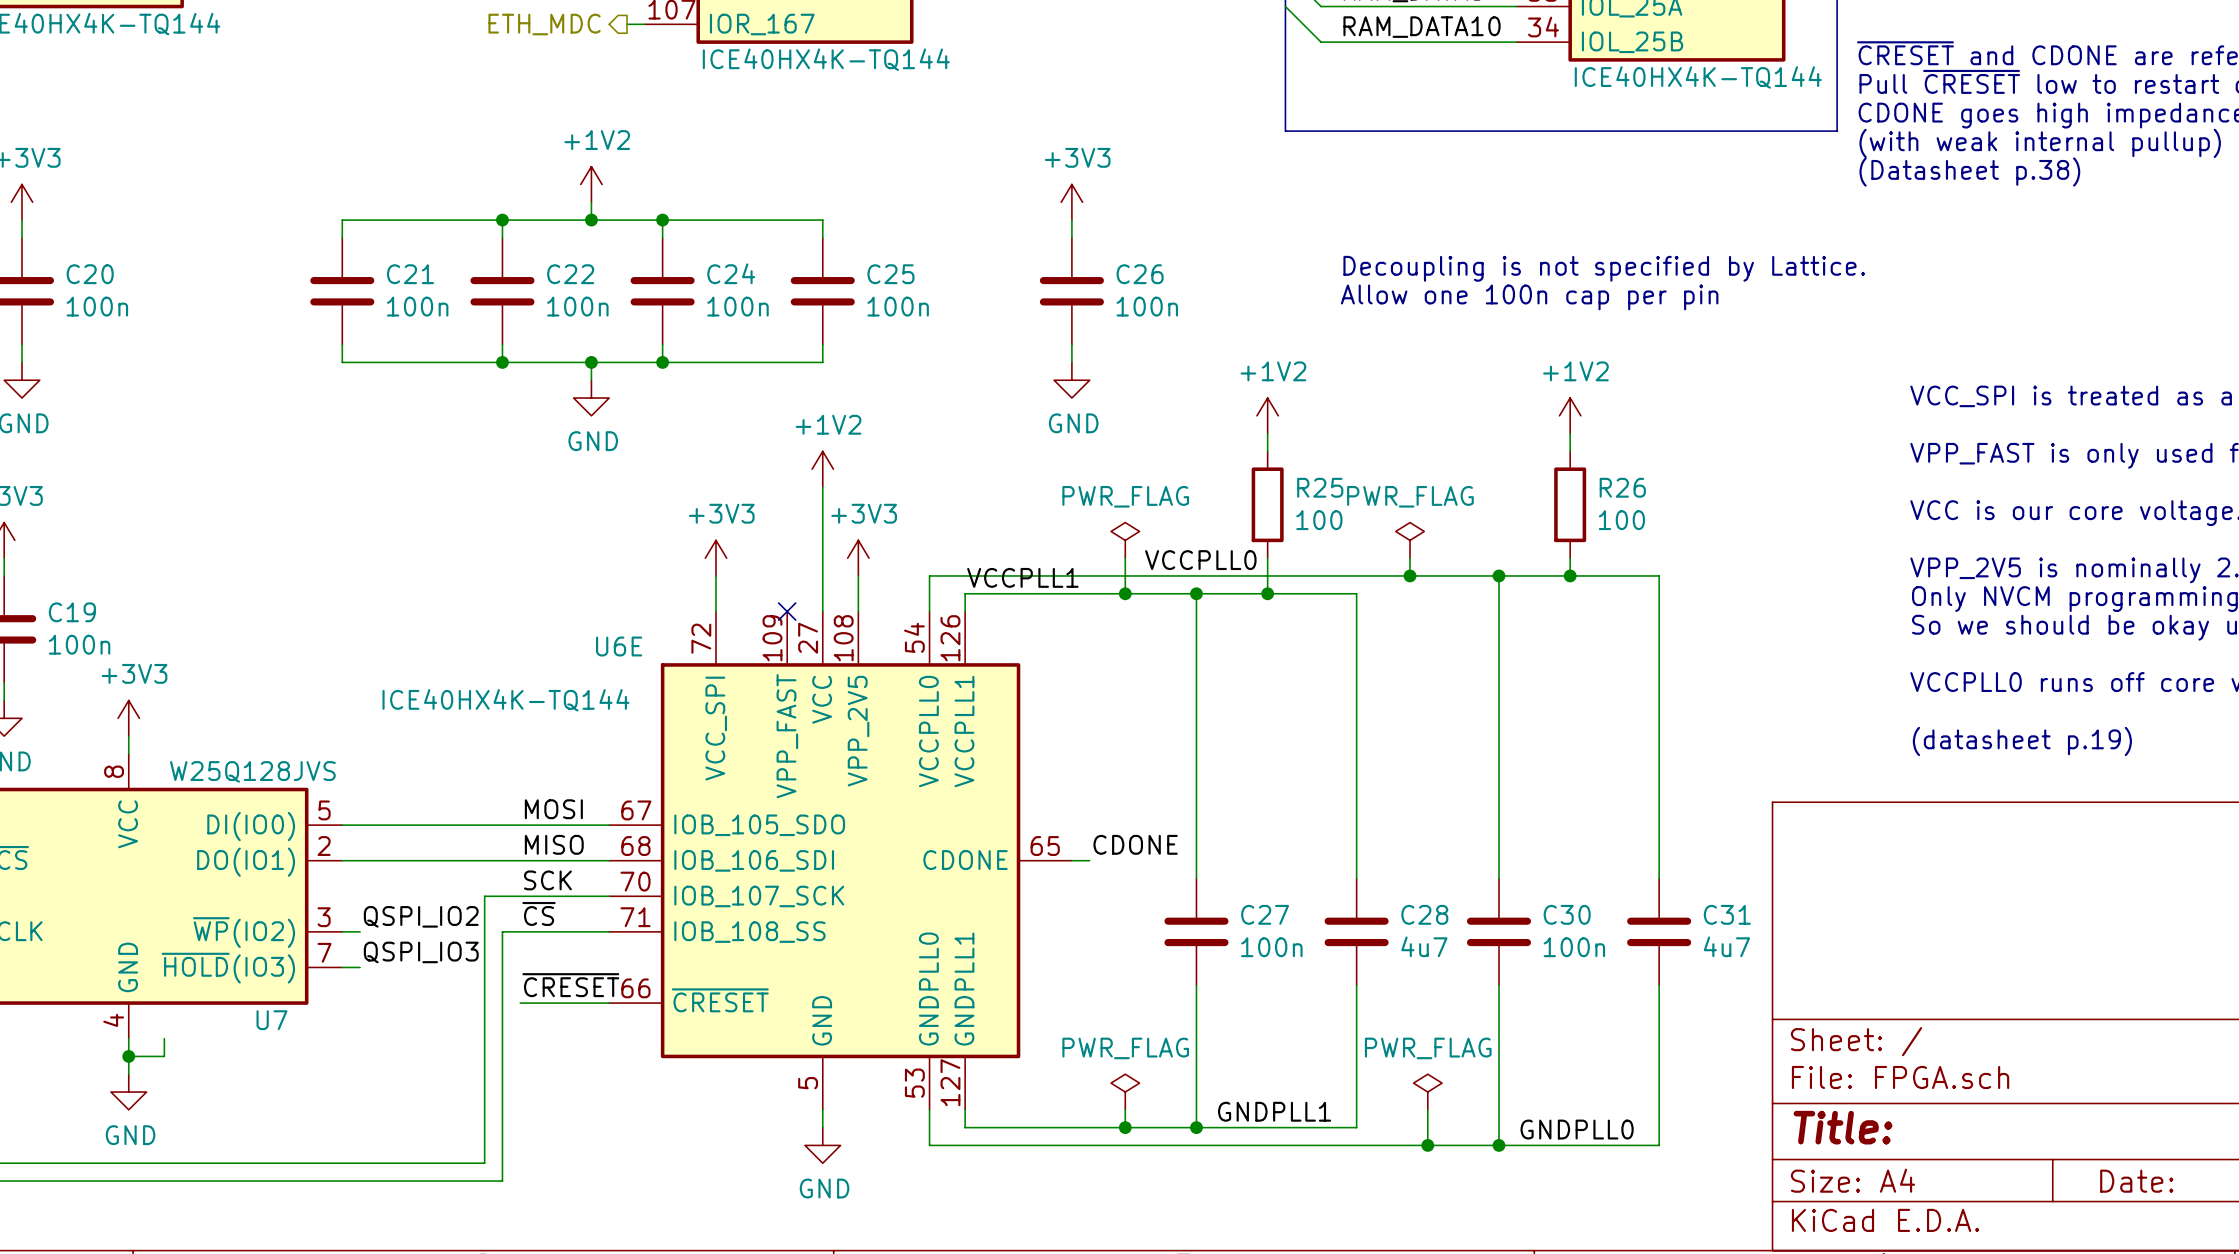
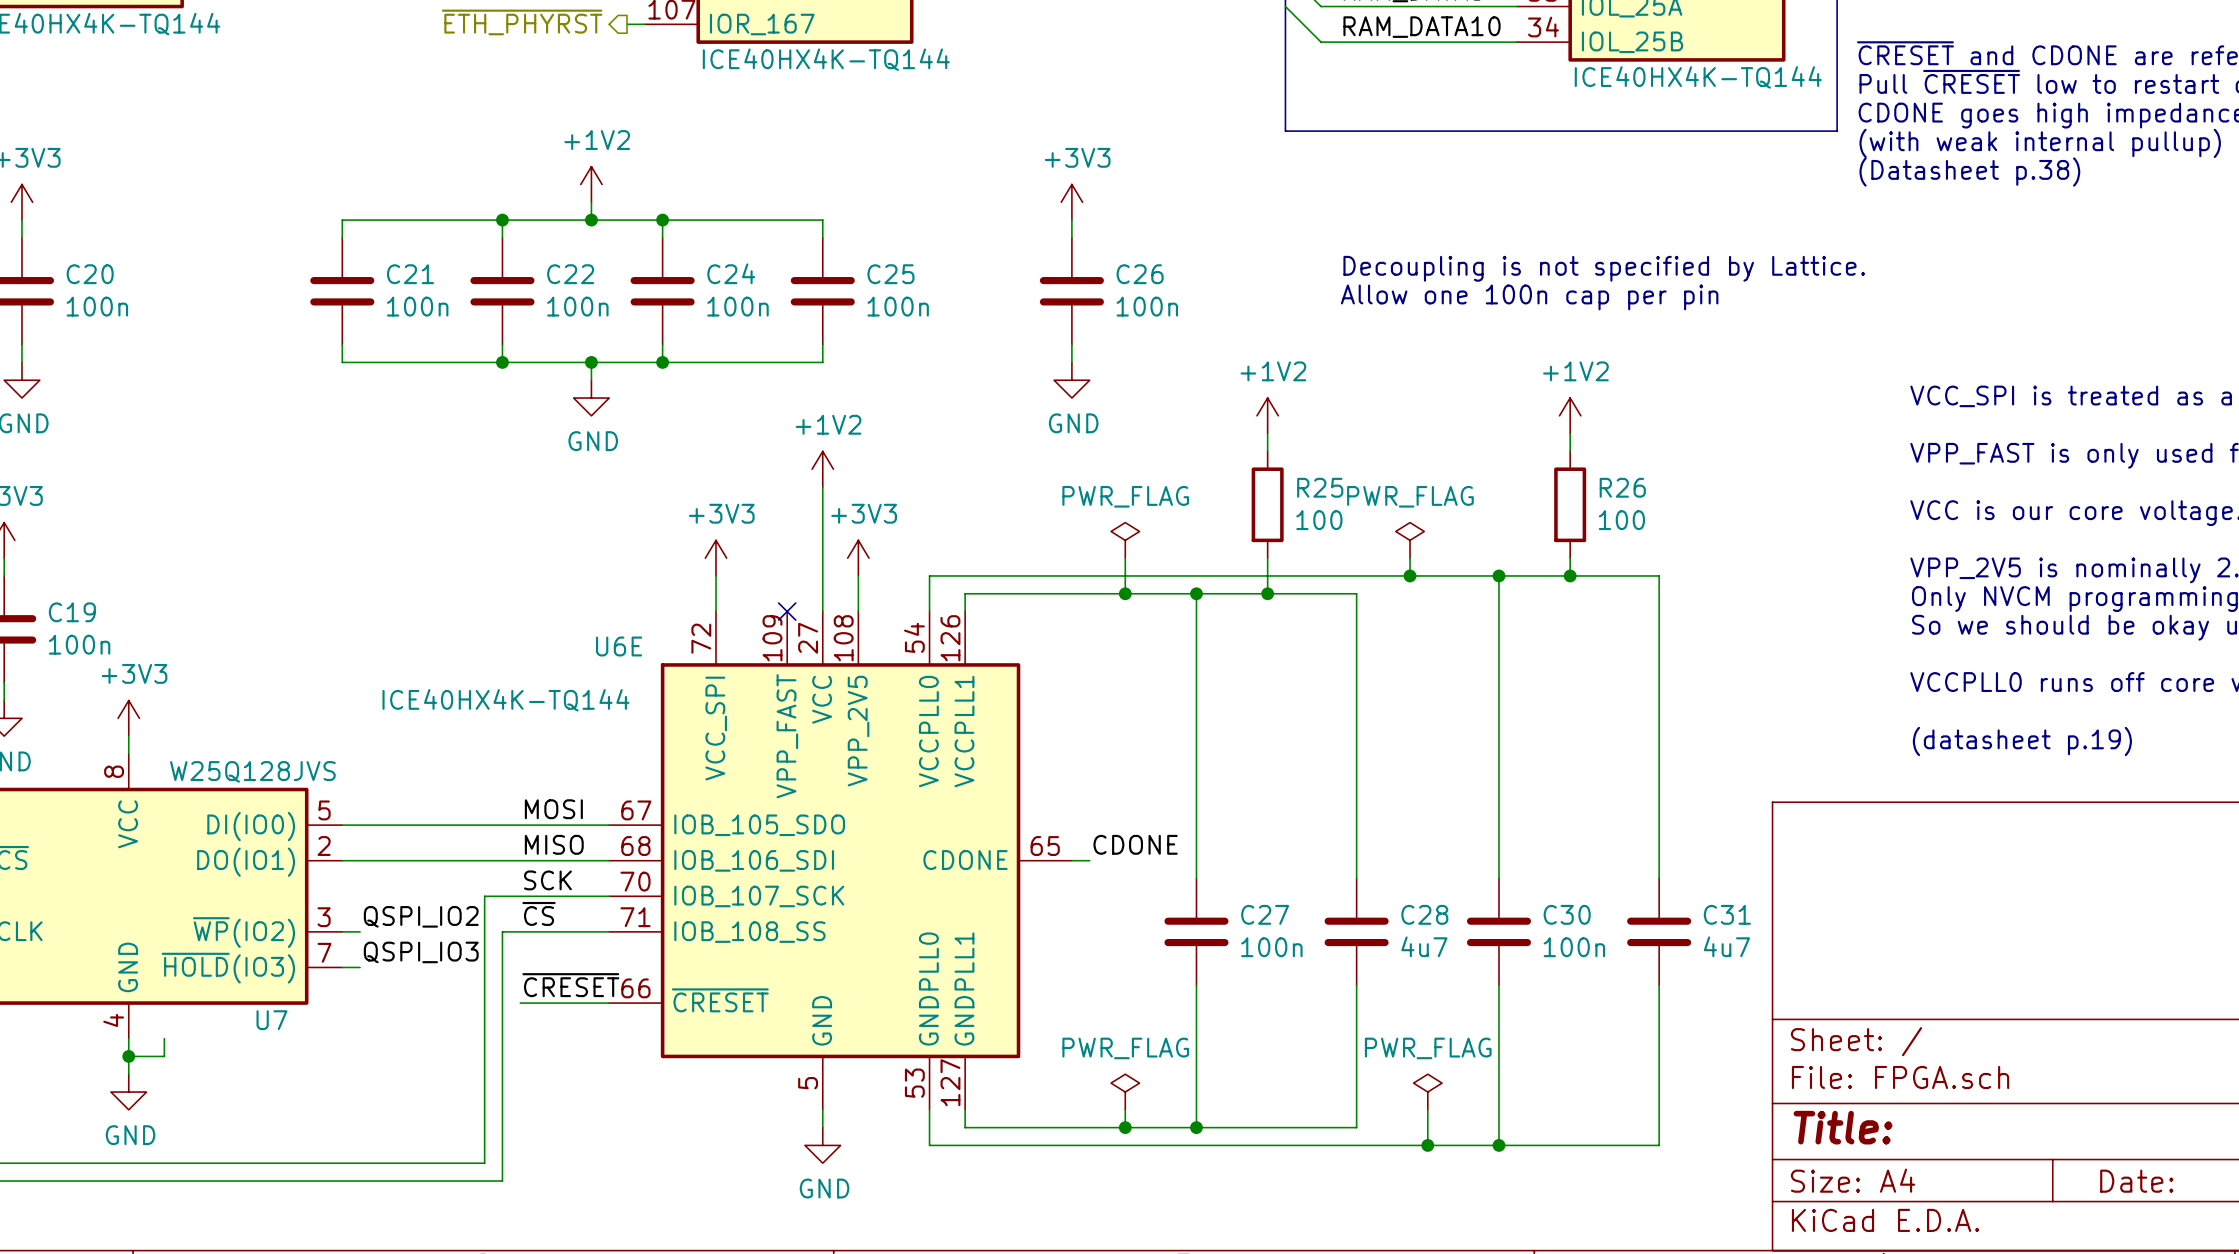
hierarchical label: ETH_MDC (544, 24) -> ~{ETH_PHYRST} (522, 22)
label: VCCPLL0 (1200, 560) -> none
label: VCCPLL1 (1022, 577) -> none
label: GNDPLL1 (1274, 1111) -> none
label: GNDPLL0 (1577, 1129) -> none

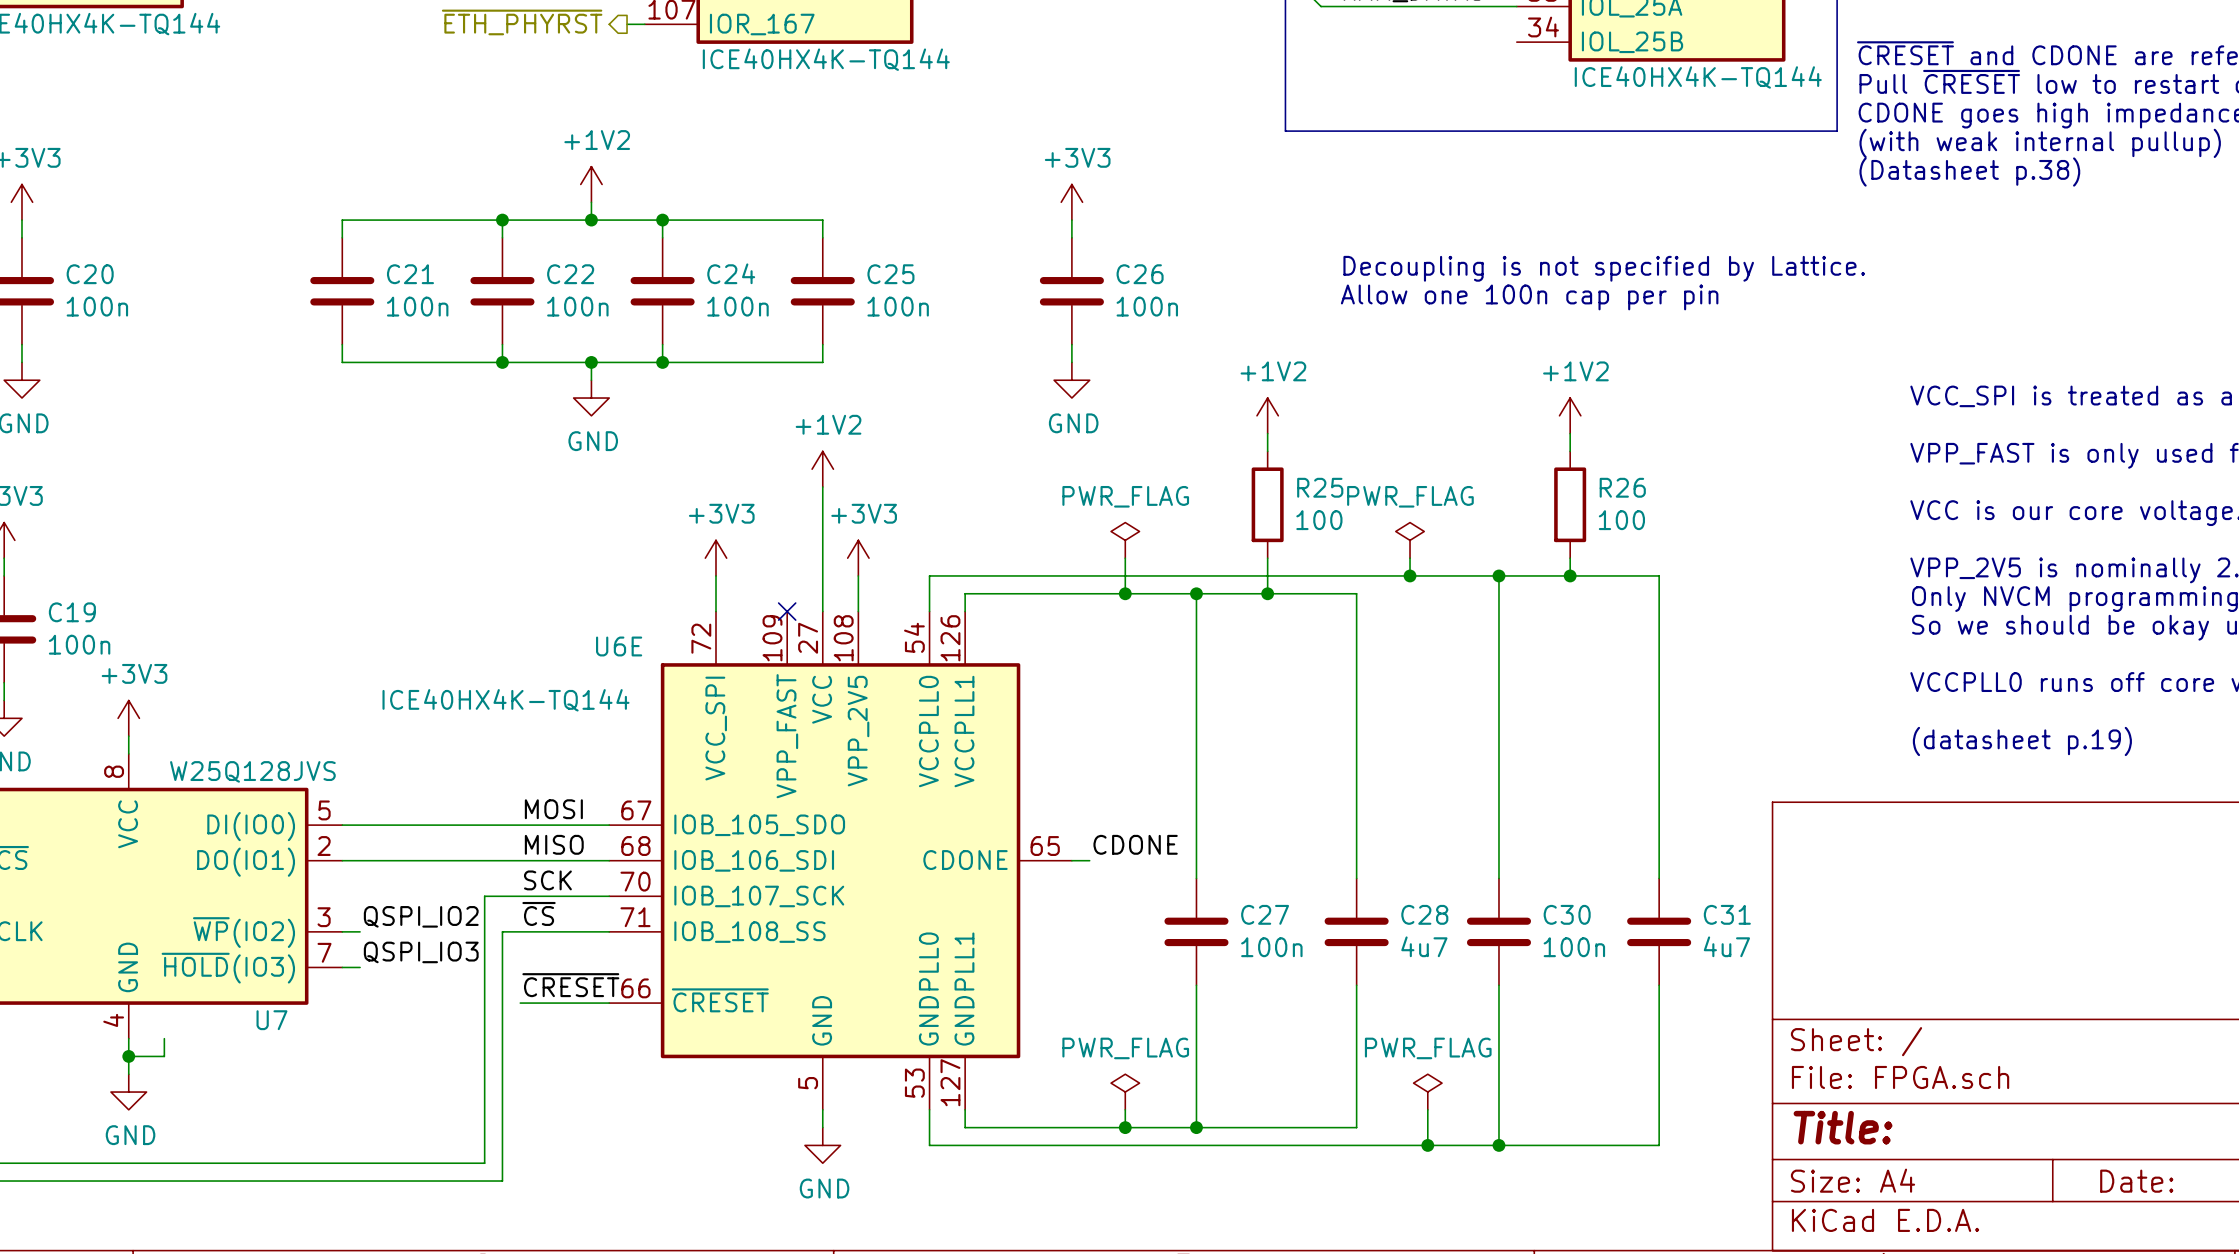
wire: (1285, 6) (1321, 42) (1516, 42) -> none
label: RAM_DATA10 (1422, 27) -> none

